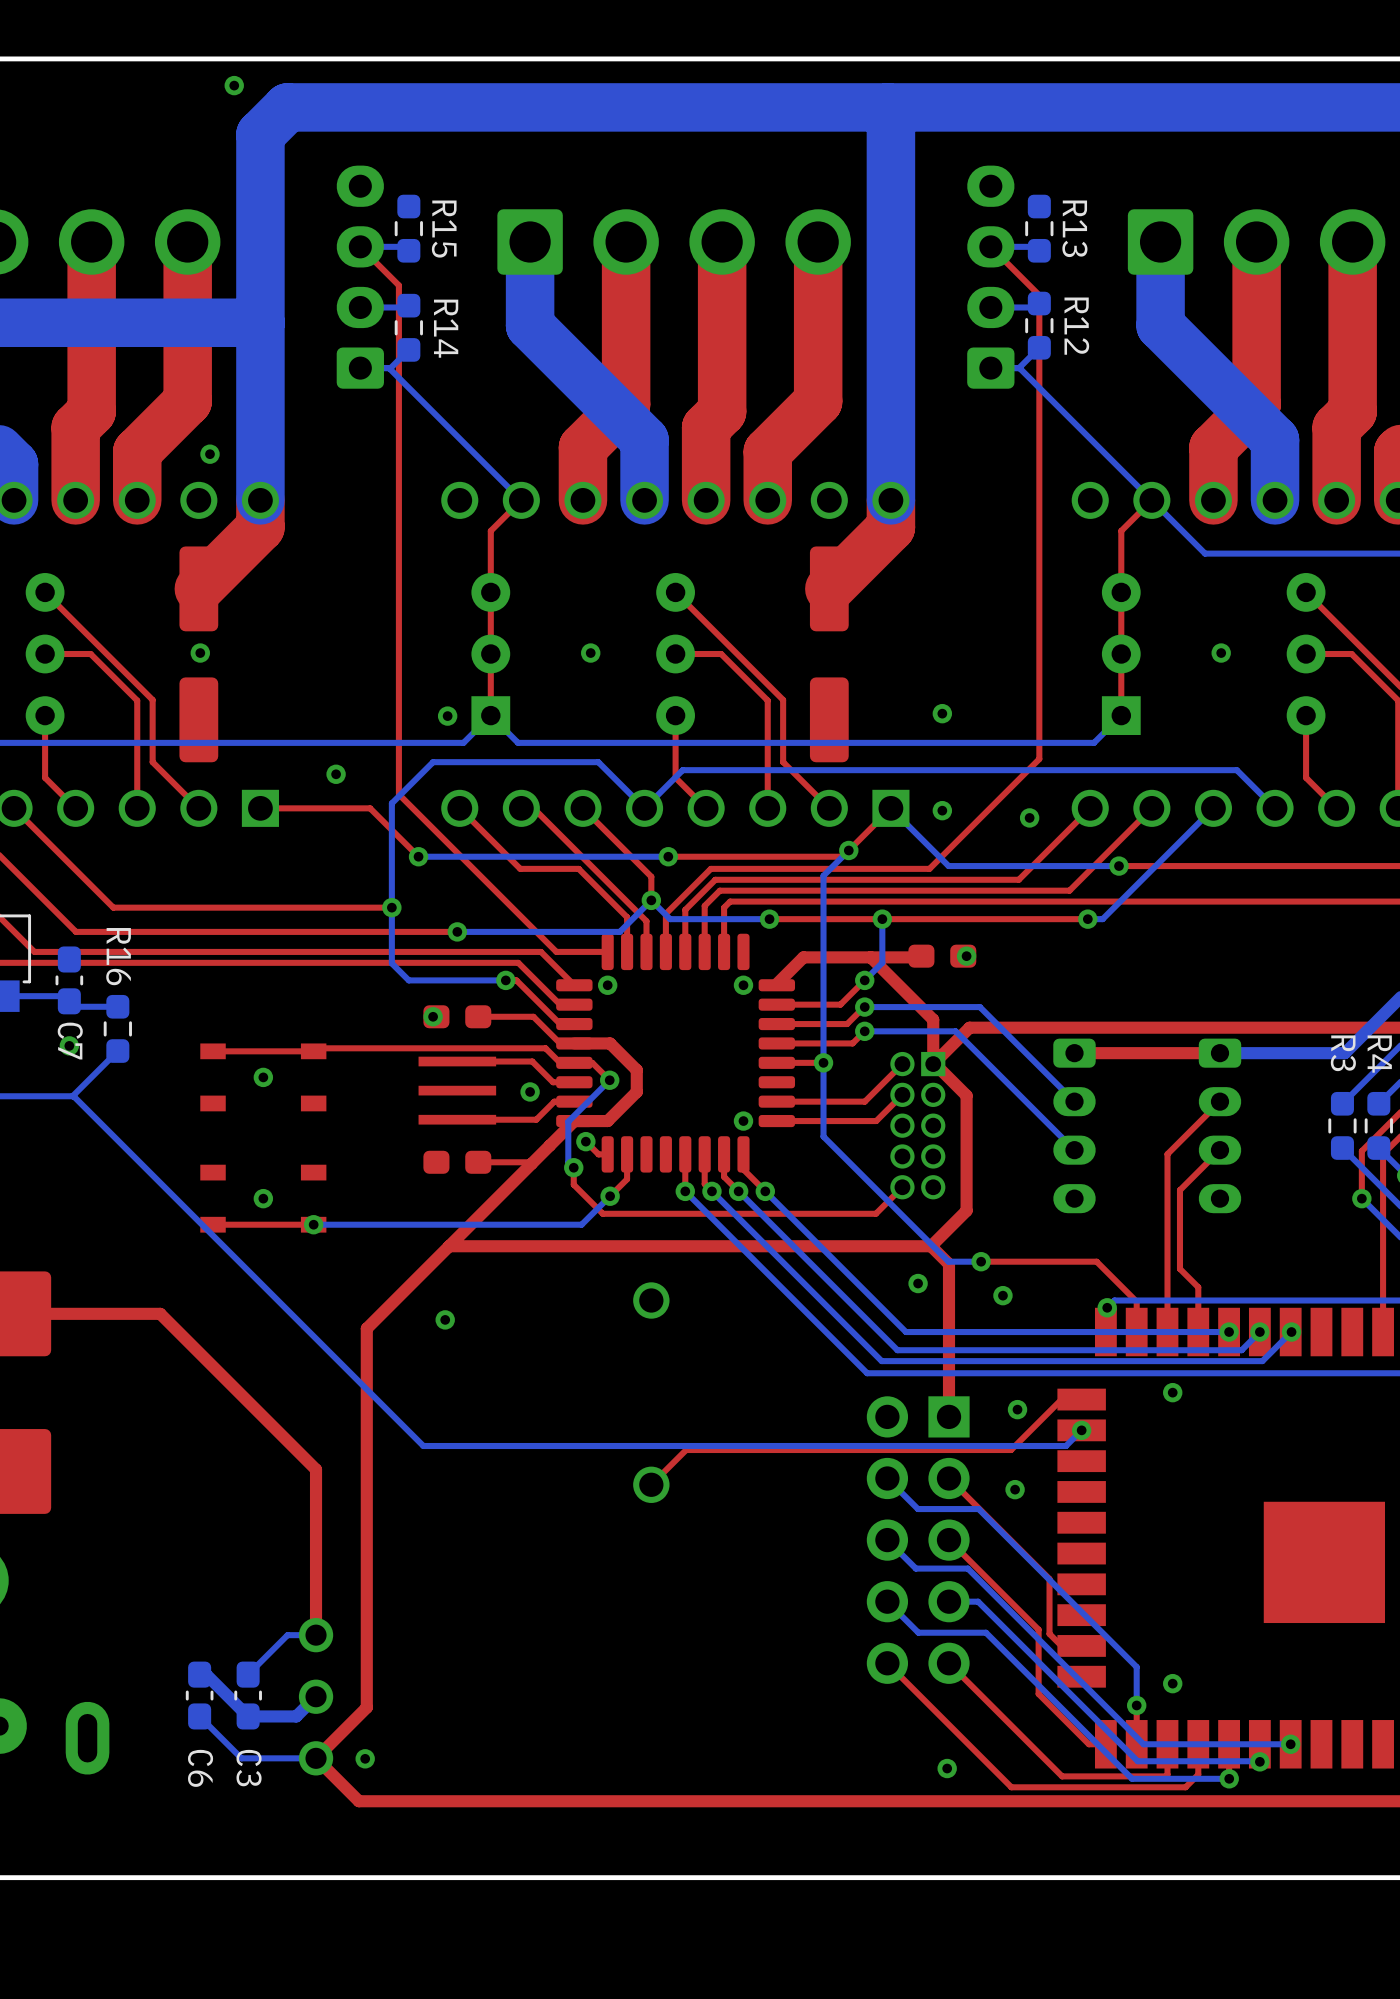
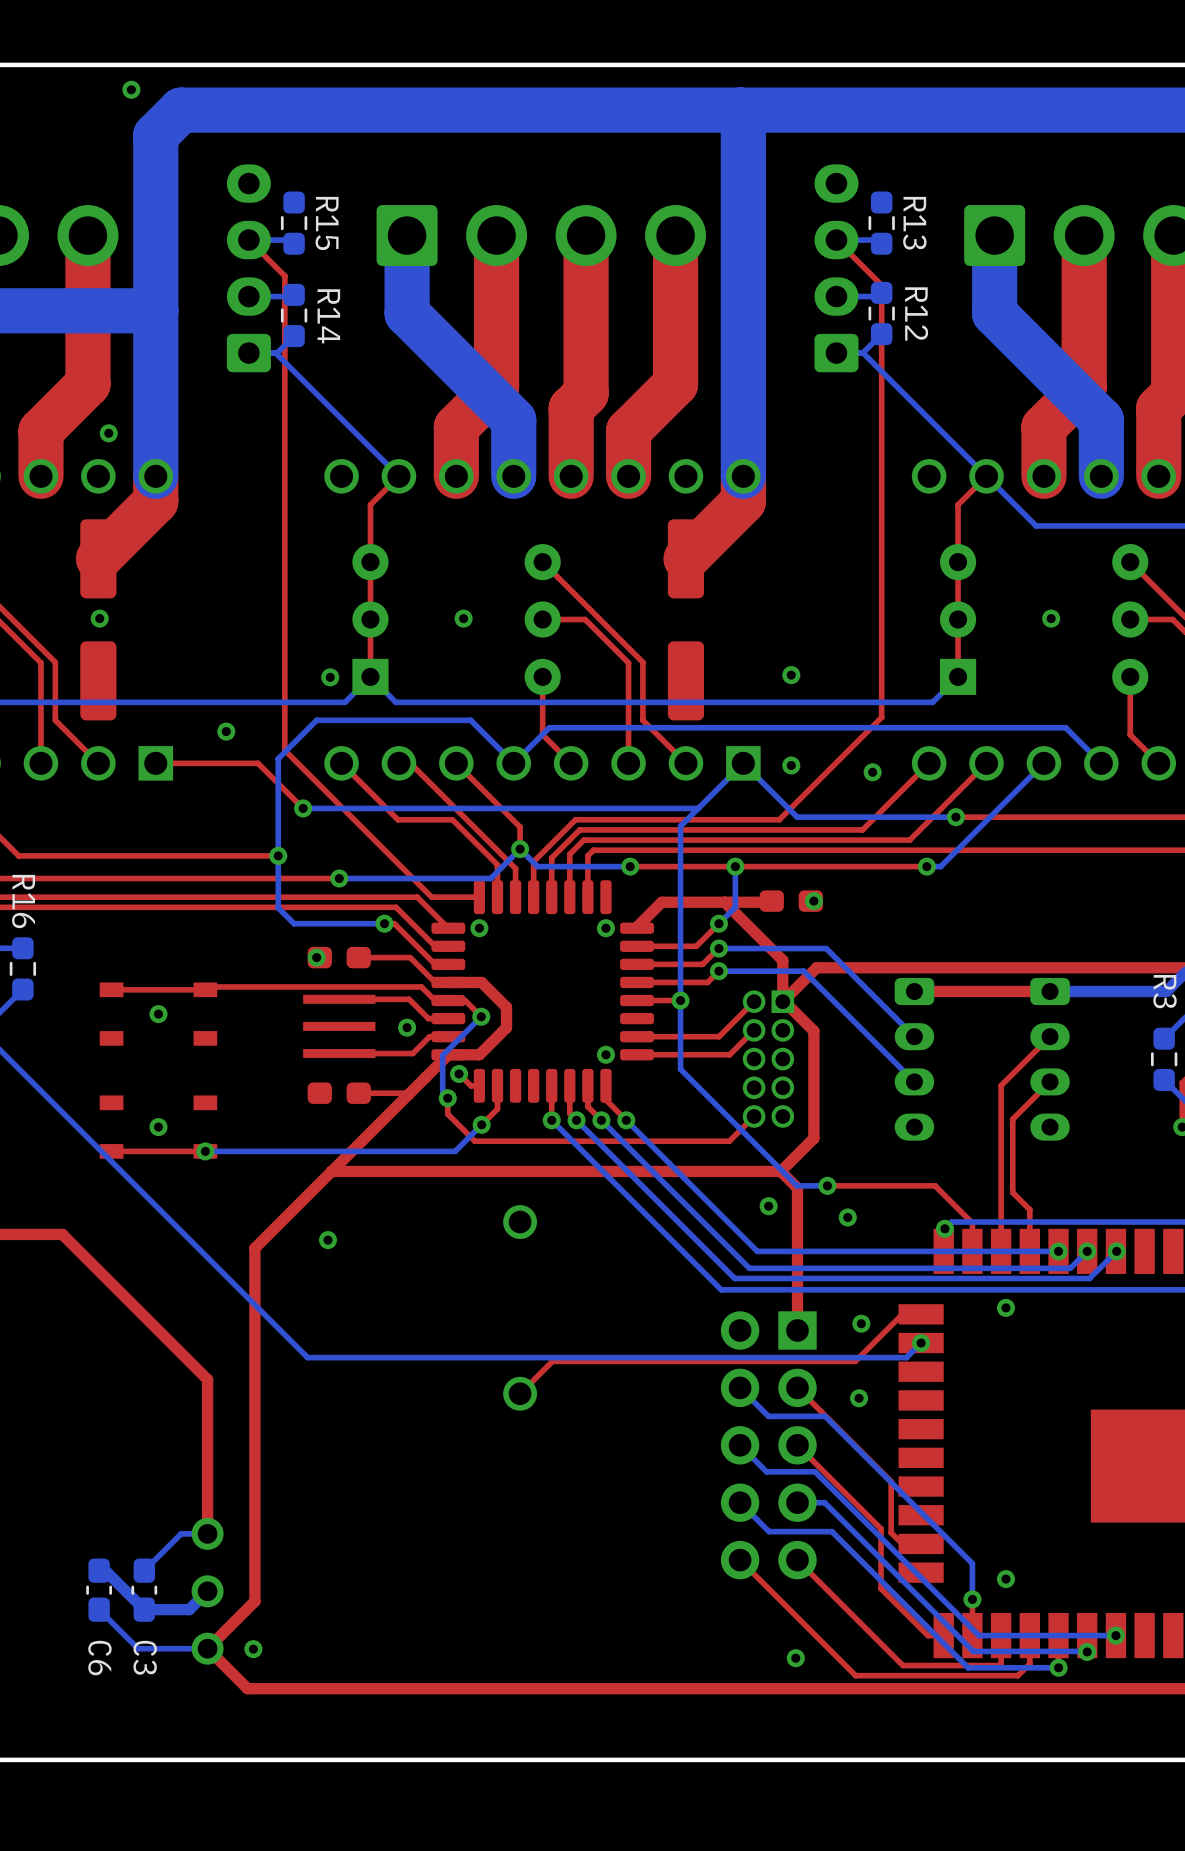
top track: (890, 808) (842, 856) (668, 856) -> none
bottom track: none -> (743, 763) (704, 802)
via: (848, 850) -> none
via: (668, 856) -> none
bottom track: none -> (698, 808) (535, 808)

